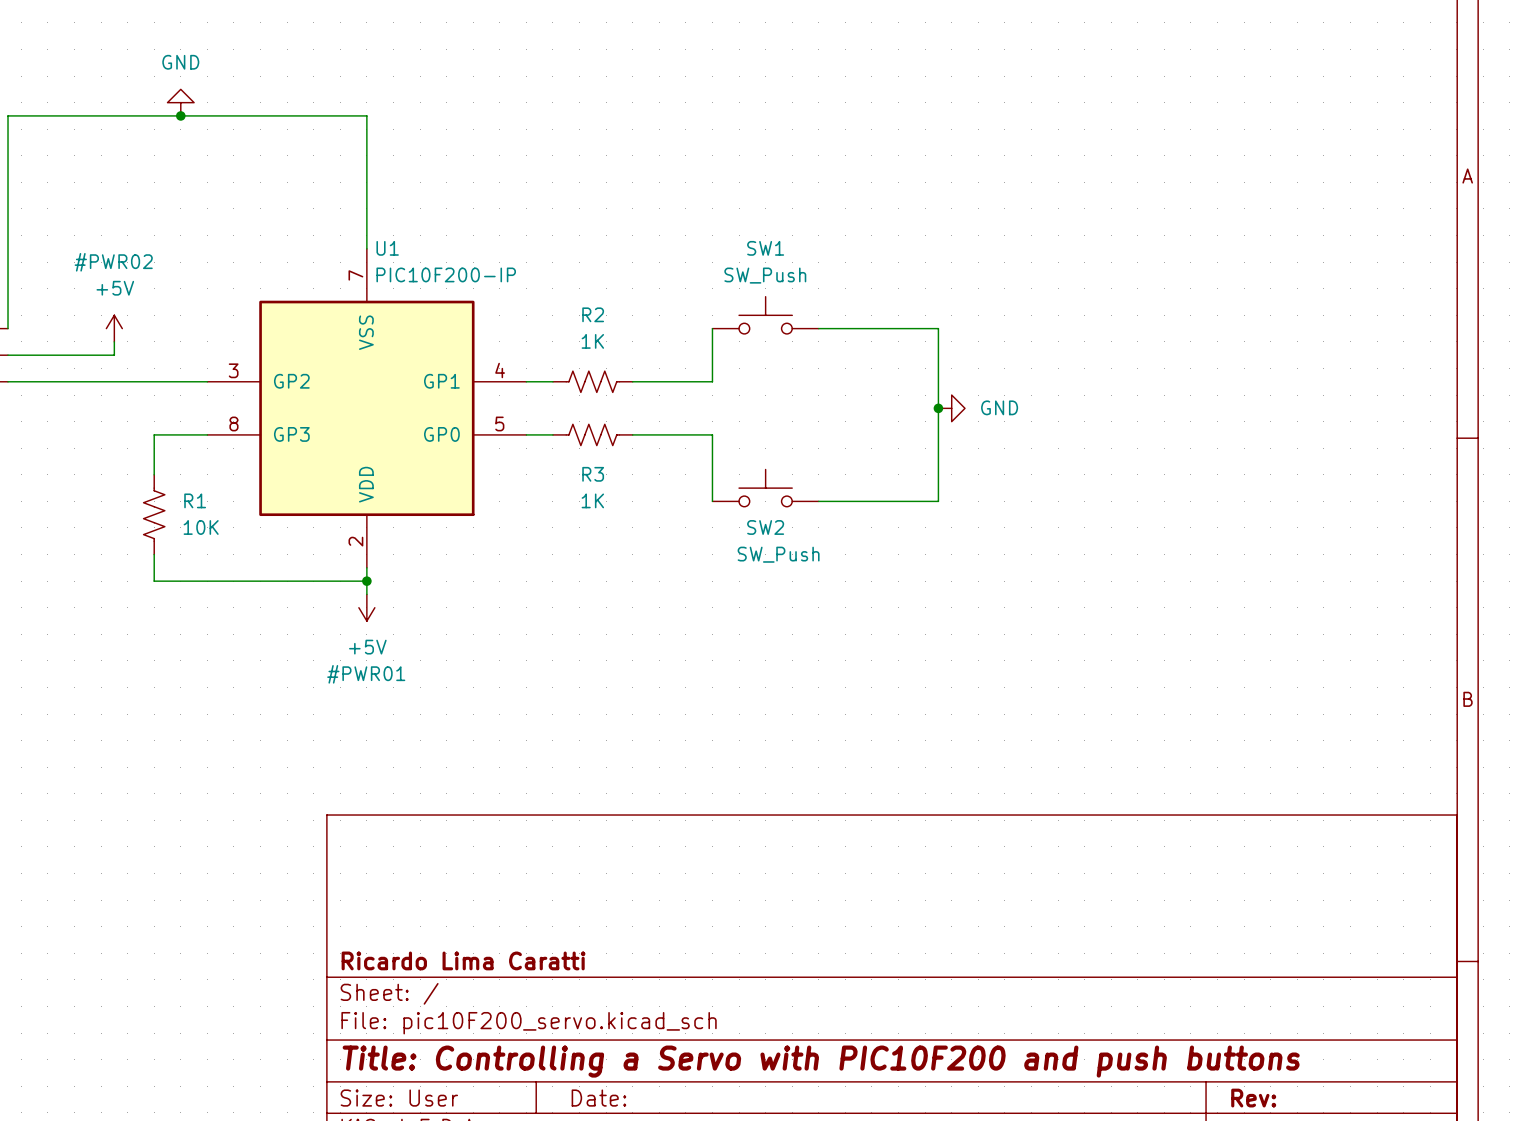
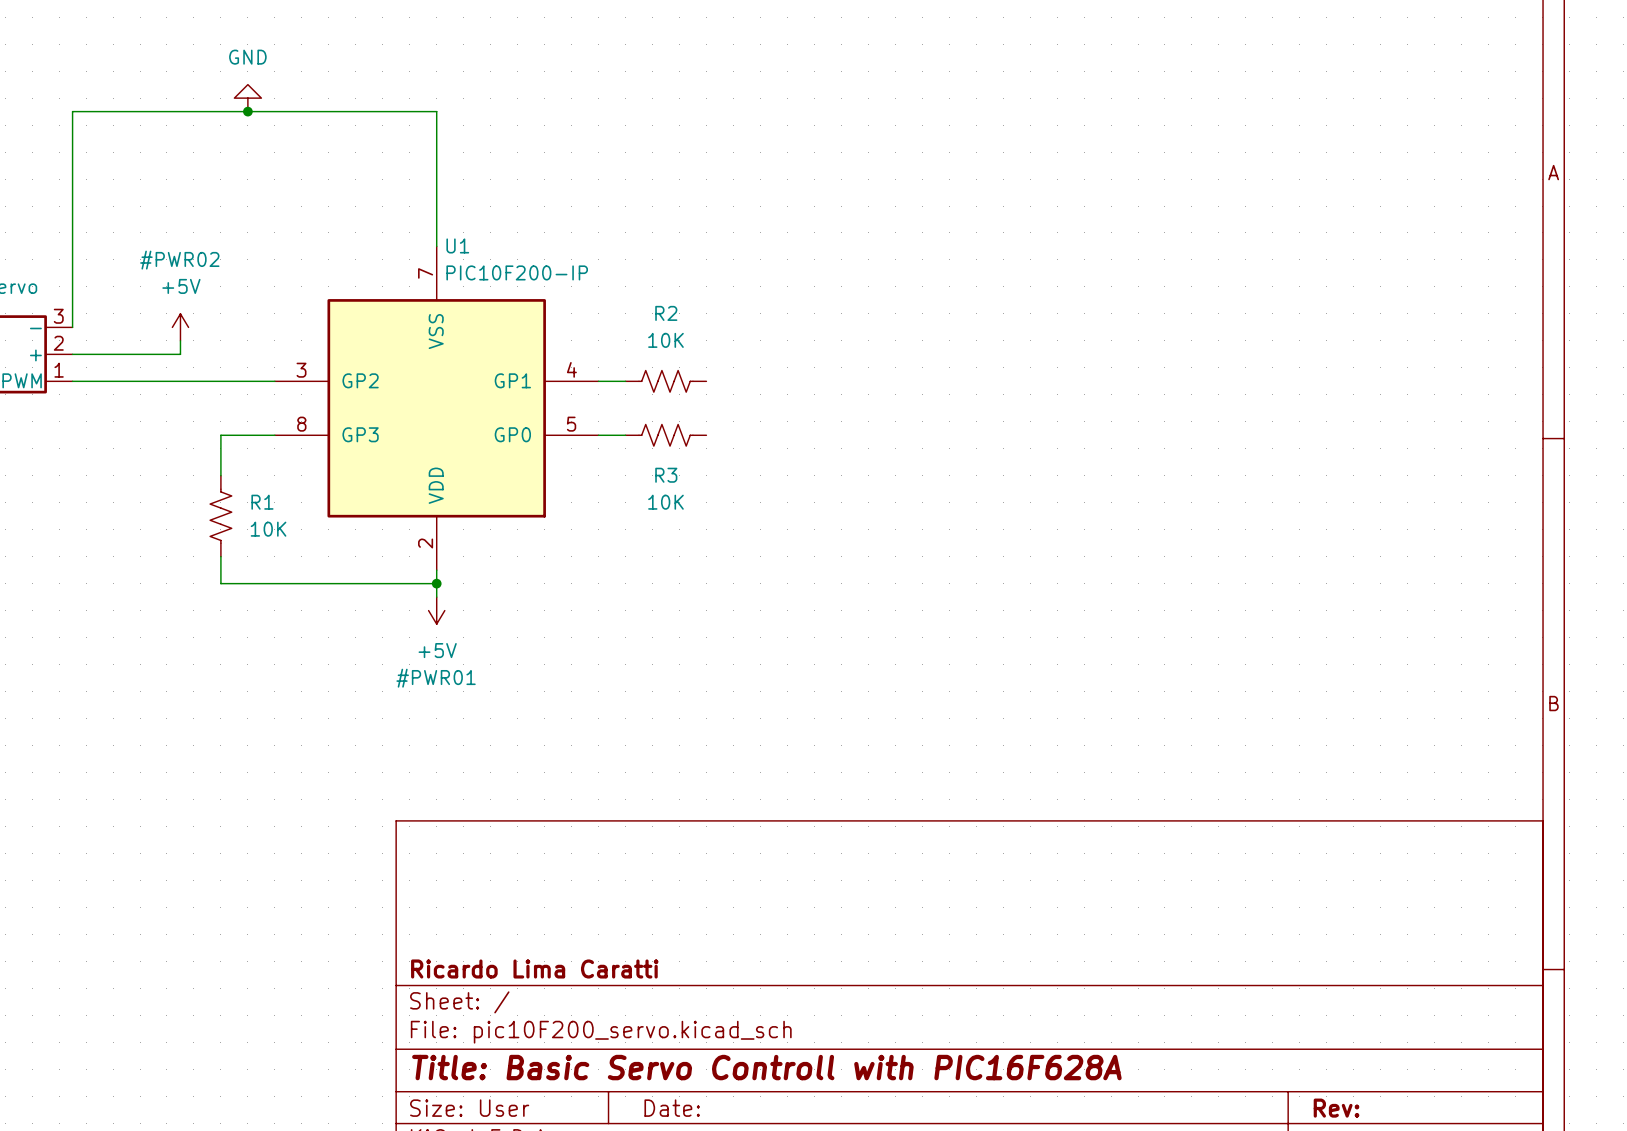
SW1: SW_Push (765, 315) -> none
wire: (712, 328) (712, 381) (632, 381) -> none
wire: (818, 328) (938, 328) (938, 501) (818, 501) -> none
R2 value: 1K (592, 341) -> 10K (665, 340)
junction: (938, 408) -> none
power symbol: GND (951, 408) -> none
wire: (632, 434) (712, 434) (712, 501) -> none
SW2: SW_Push (765, 488) -> none
R3 value: 1K (592, 500) -> 10K (665, 502)
title block: Title: Controlling a Servo with PIC10F200 and push buttons (821, 1061) -> Title: Basic Servo Controll with PIC16F628A (766, 1067)

